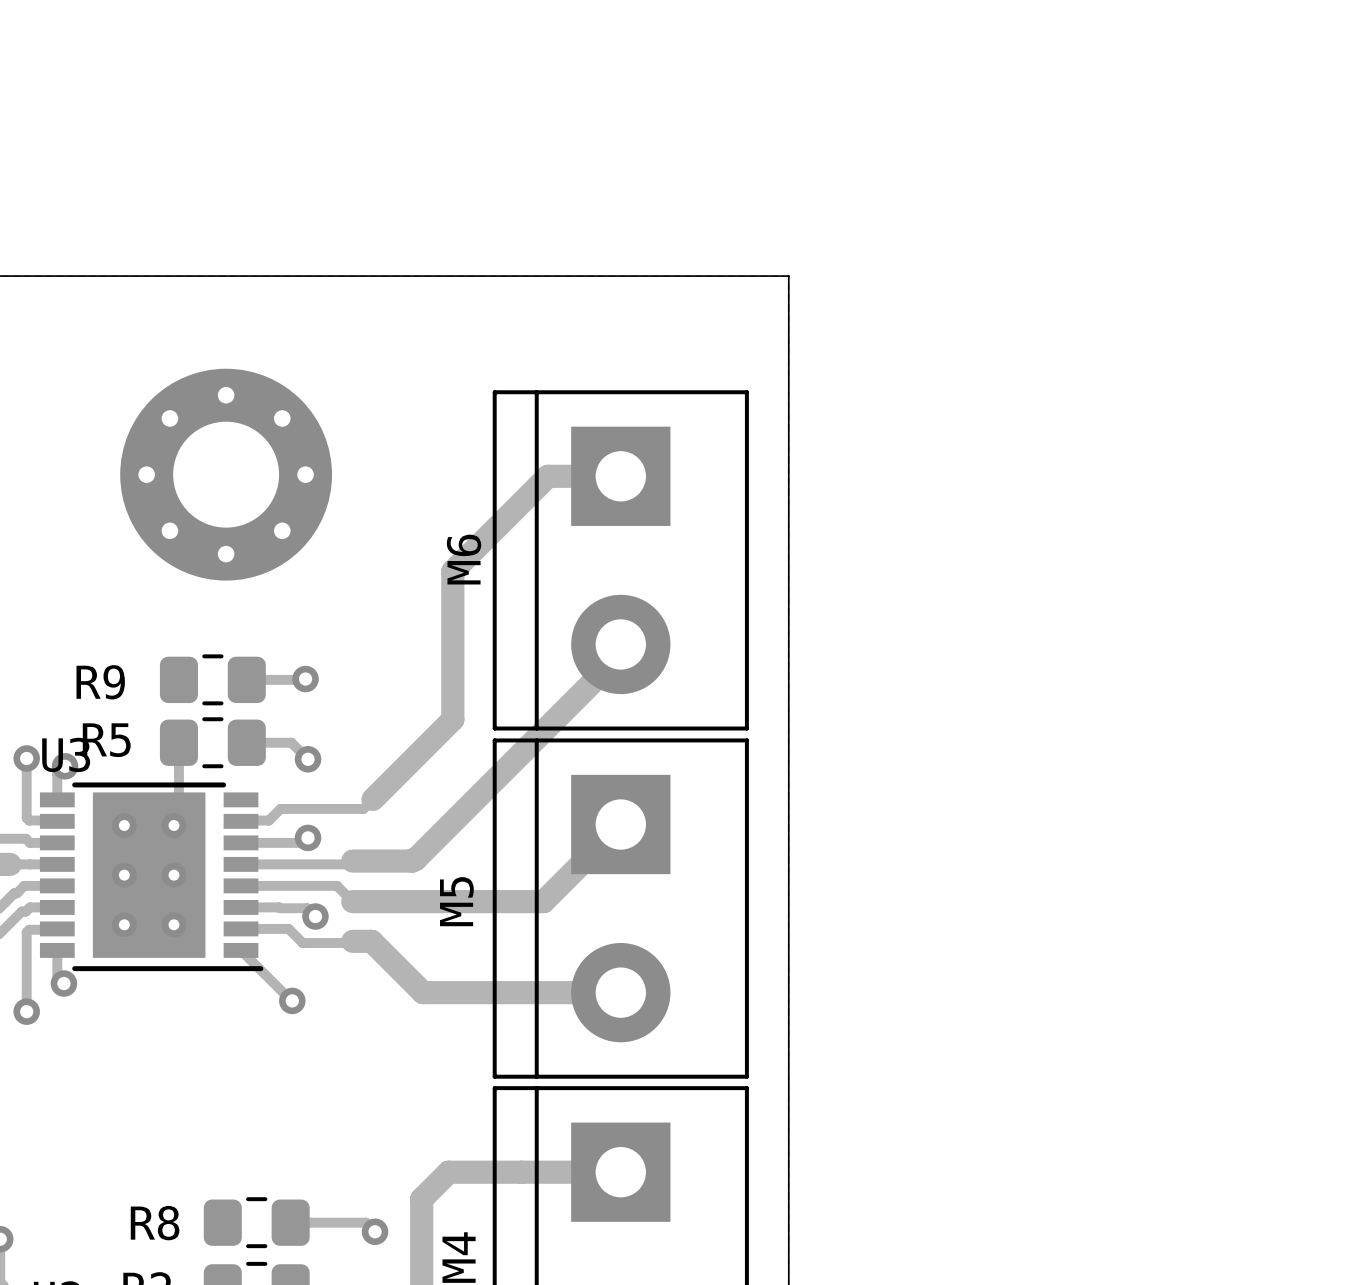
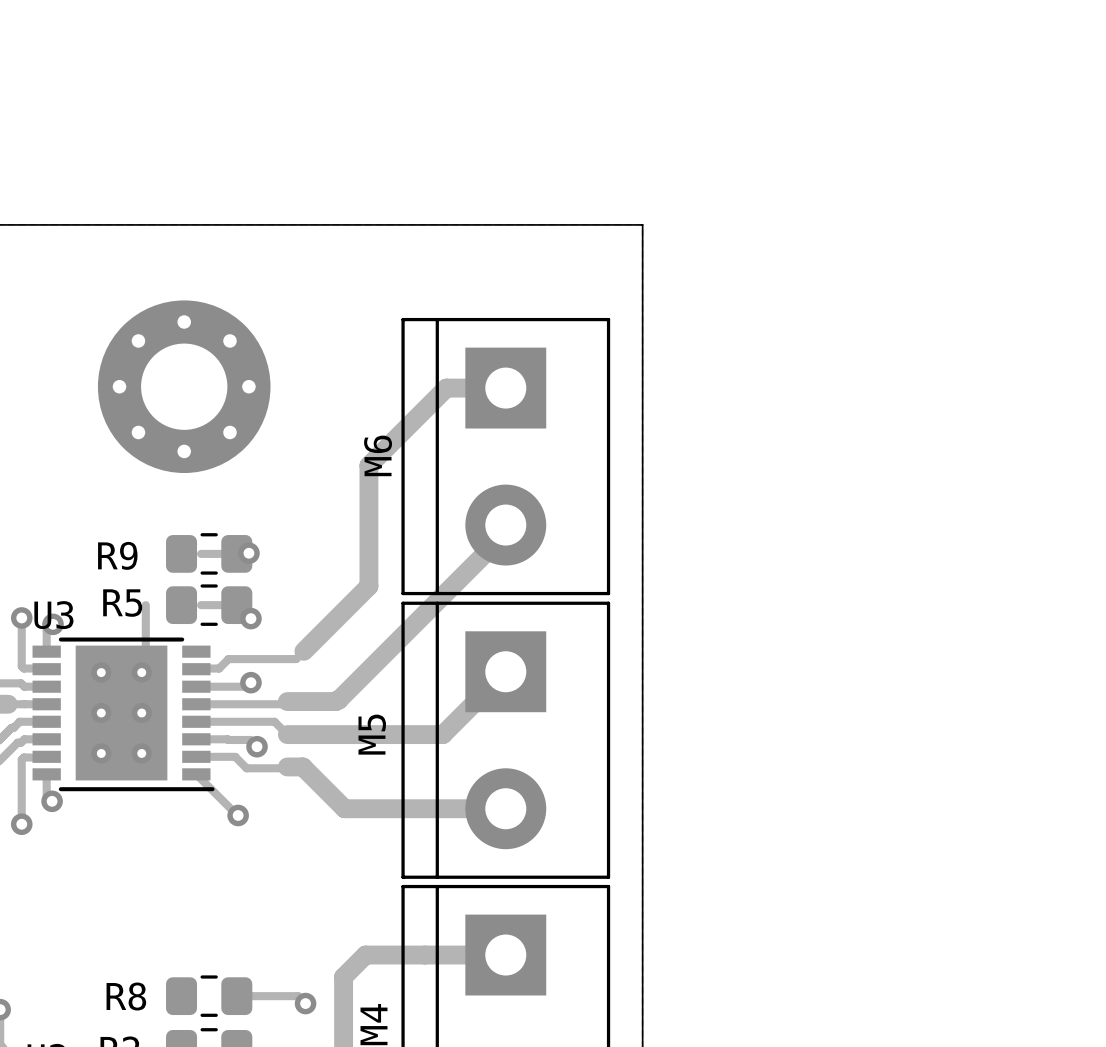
R9 position: (212, 679) -> (209, 553)
R5 position: (212, 742) -> (209, 605)

